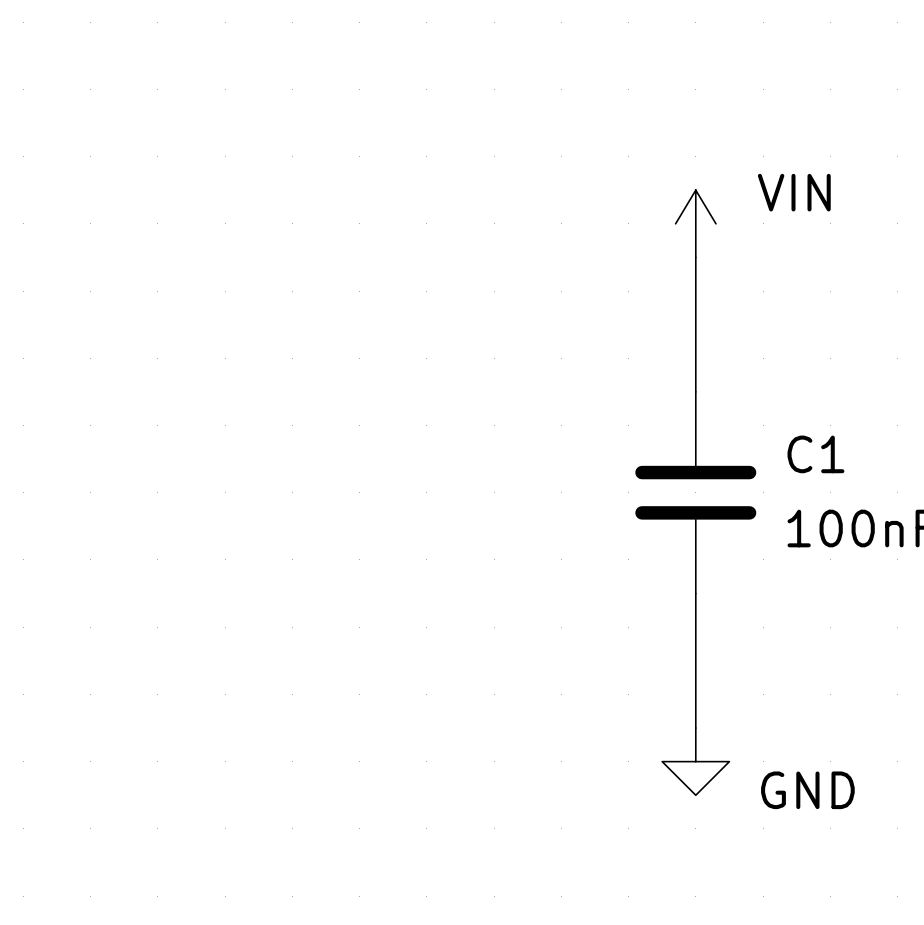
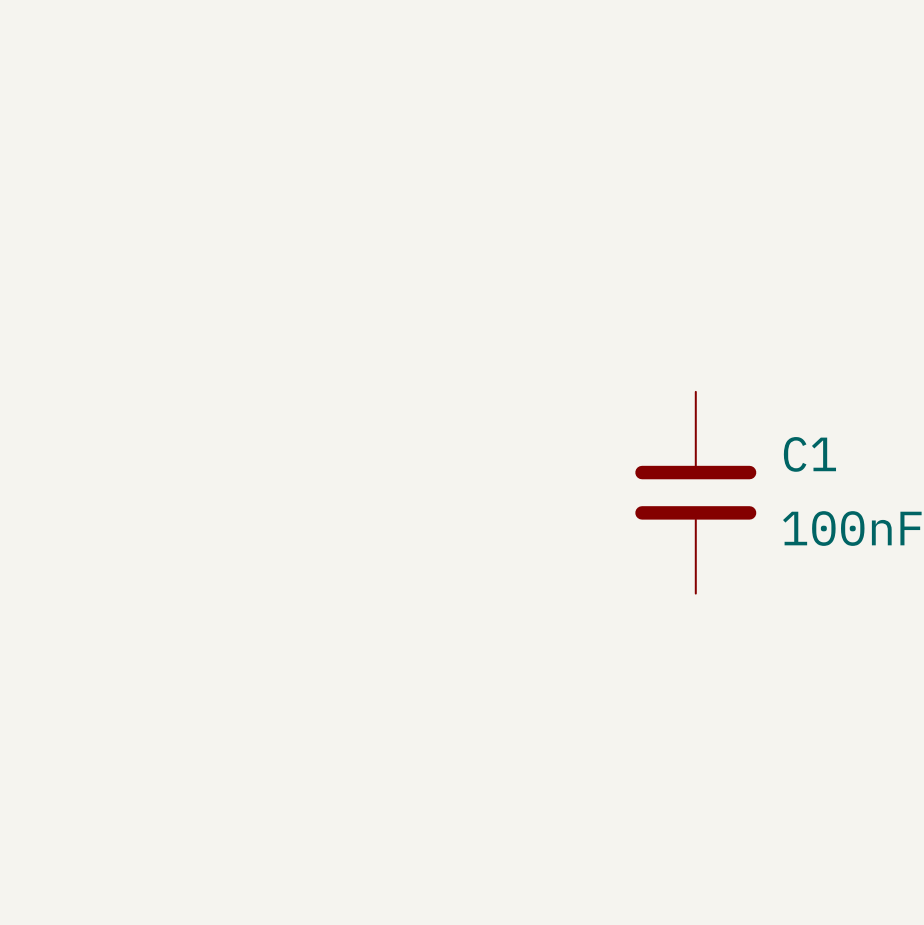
power symbol: VIN (695, 223) -> none
wire: (695, 257) (695, 391) -> none
wire: (695, 593) (695, 728) -> none
power symbol: GND (695, 761) -> none

